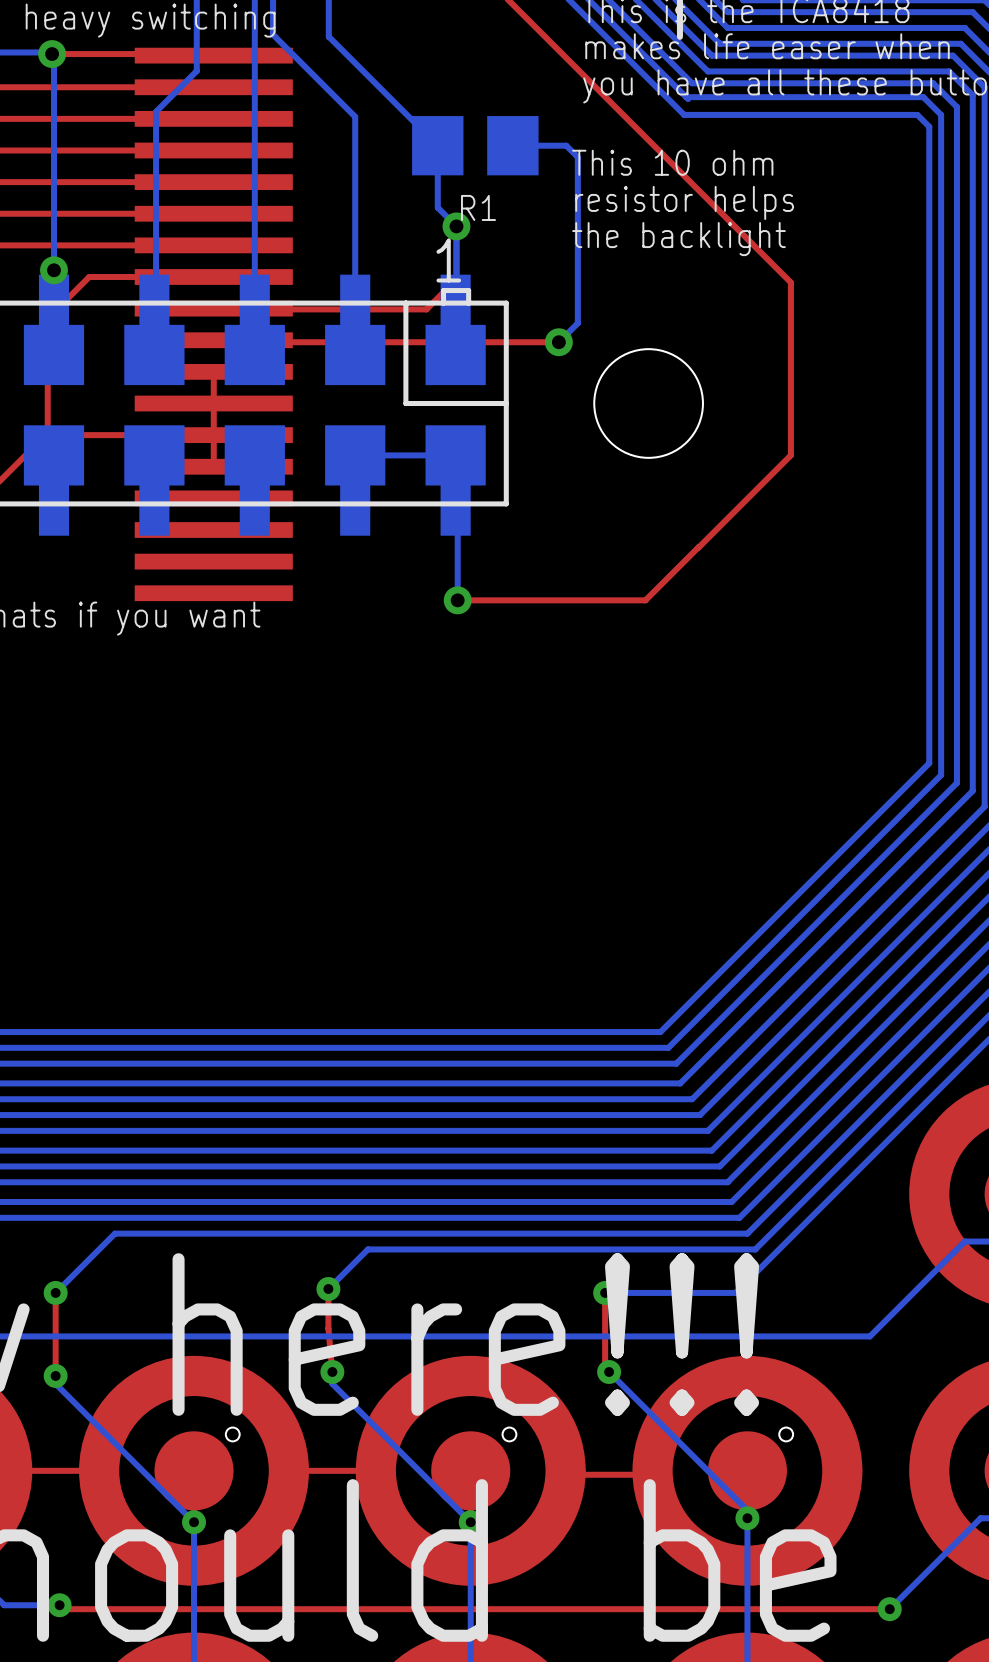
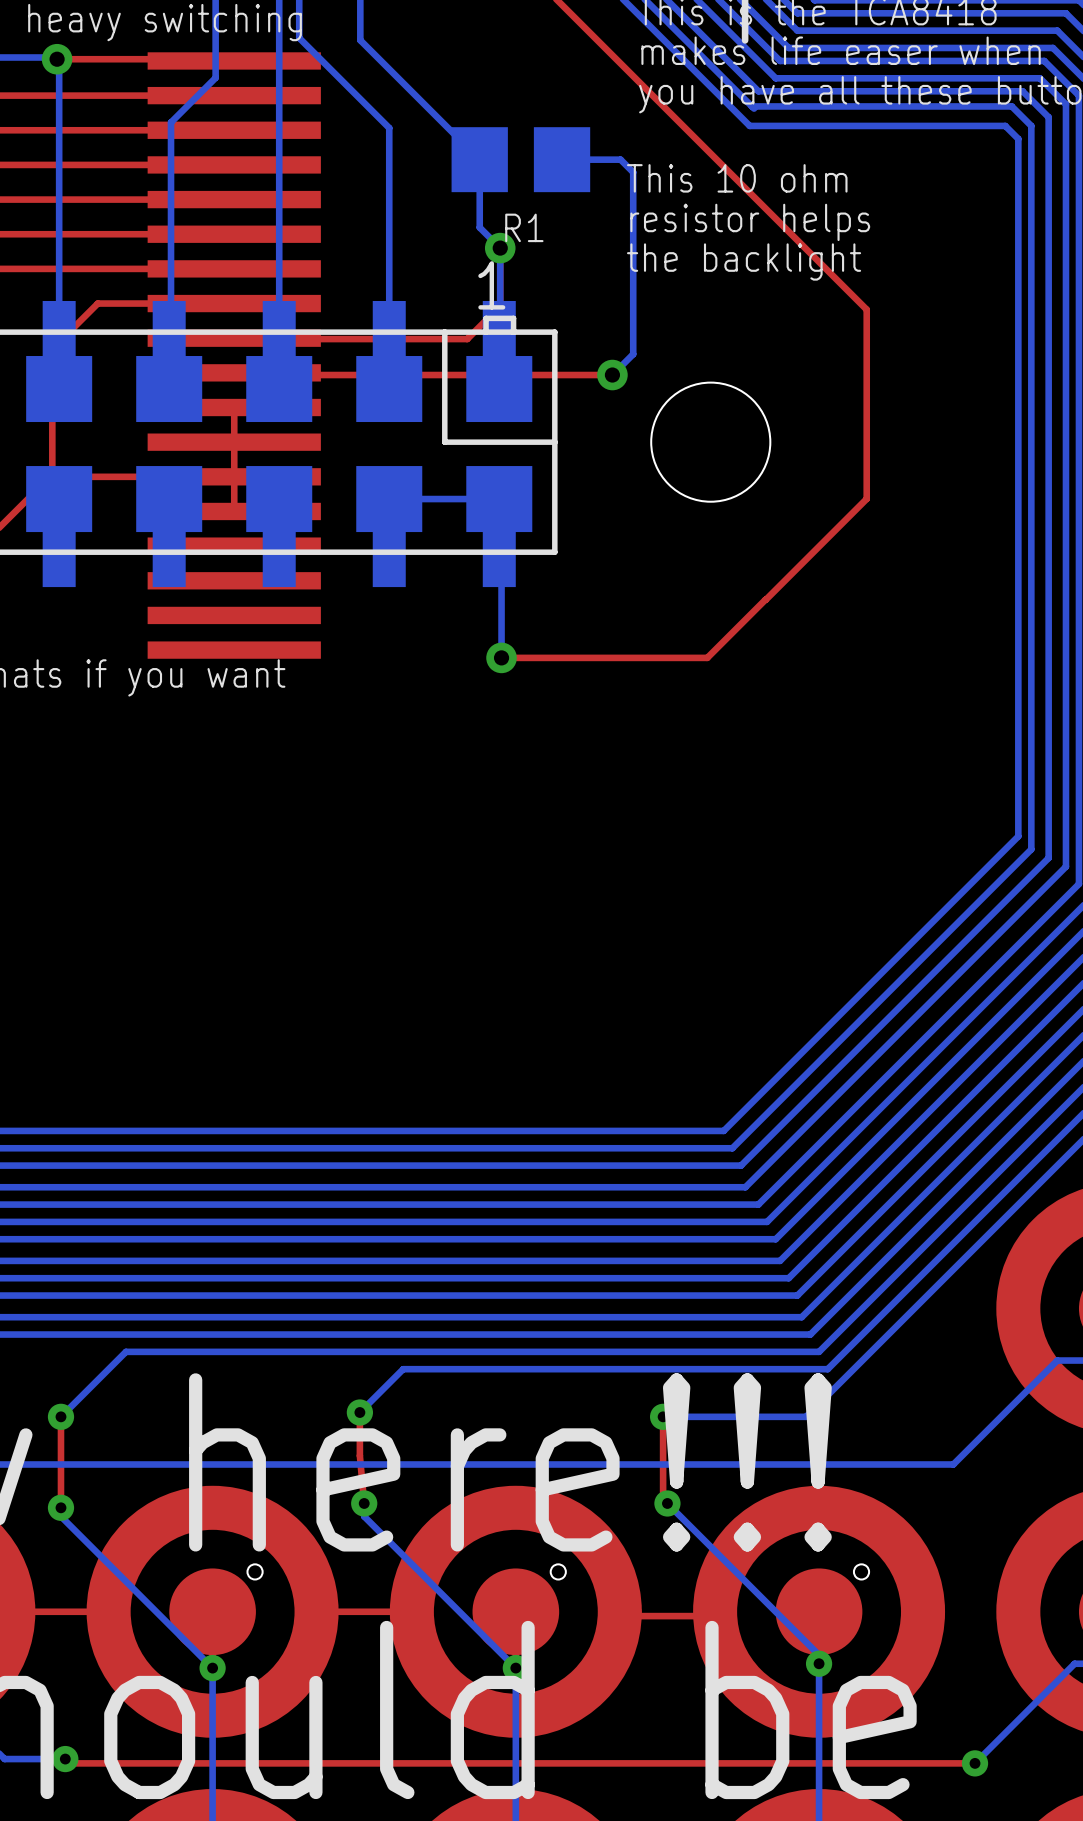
via: (53, 270) -> none

